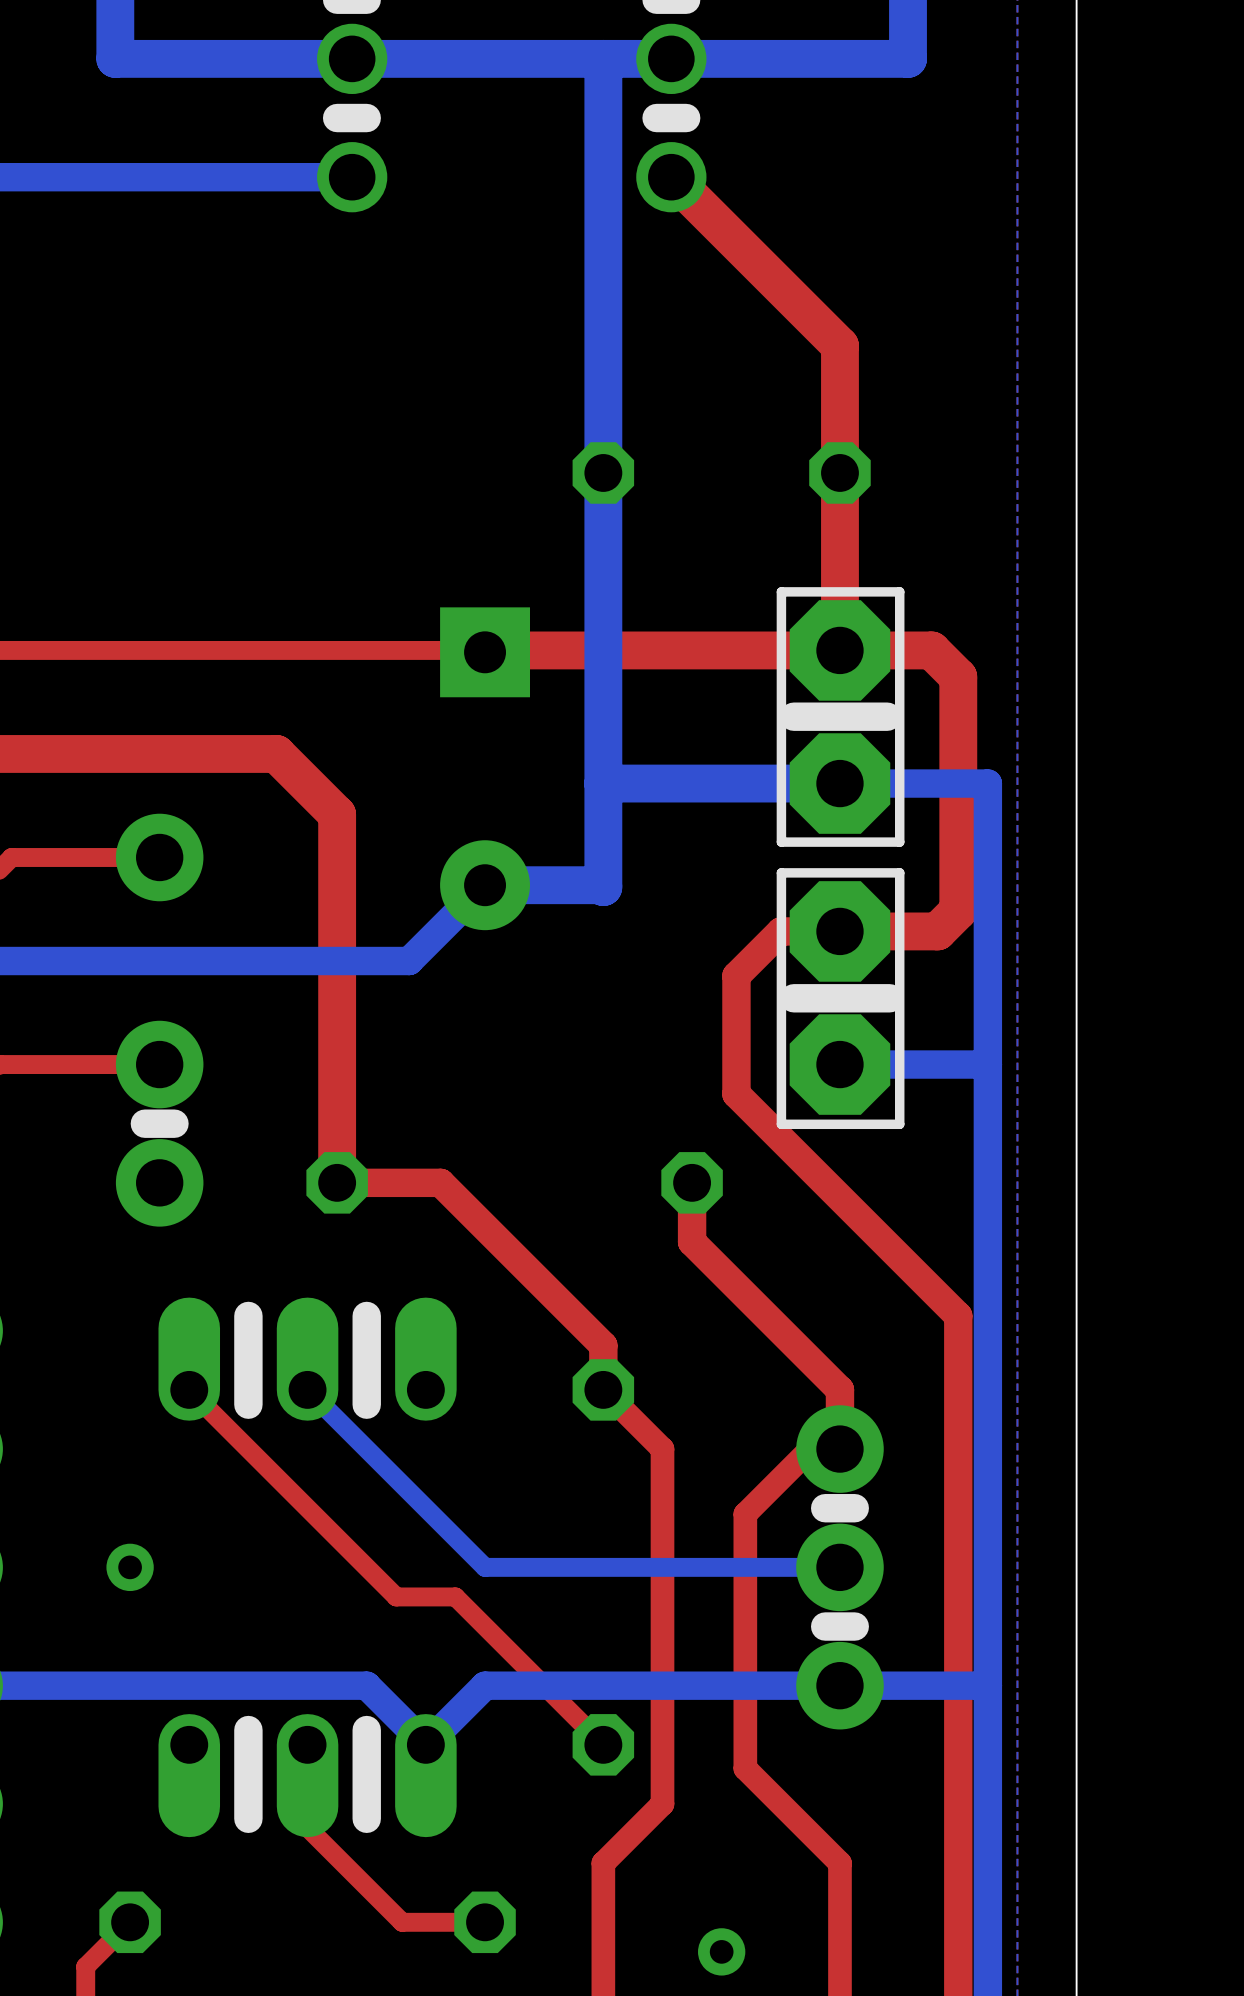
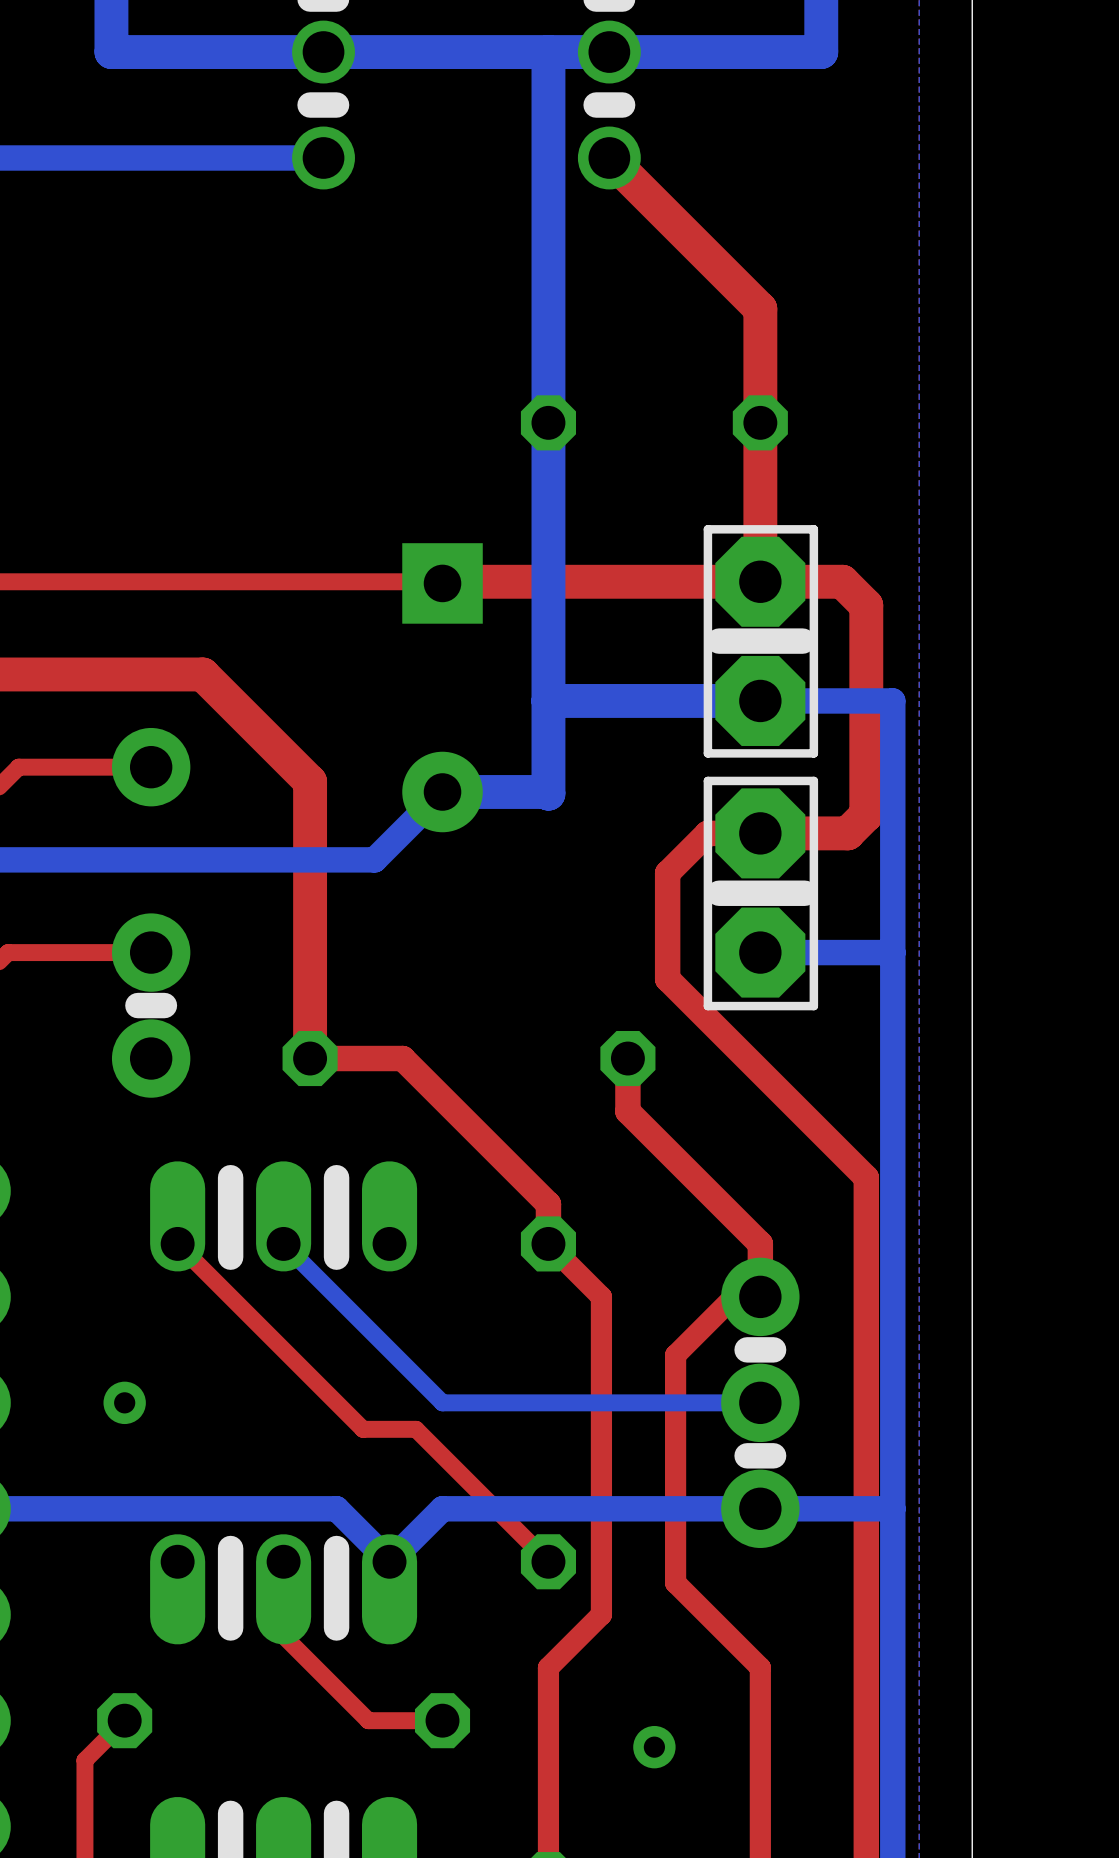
top track: (217, 753) (276, 753) (337, 814) (337, 873) -> (202, 674) (310, 781)

